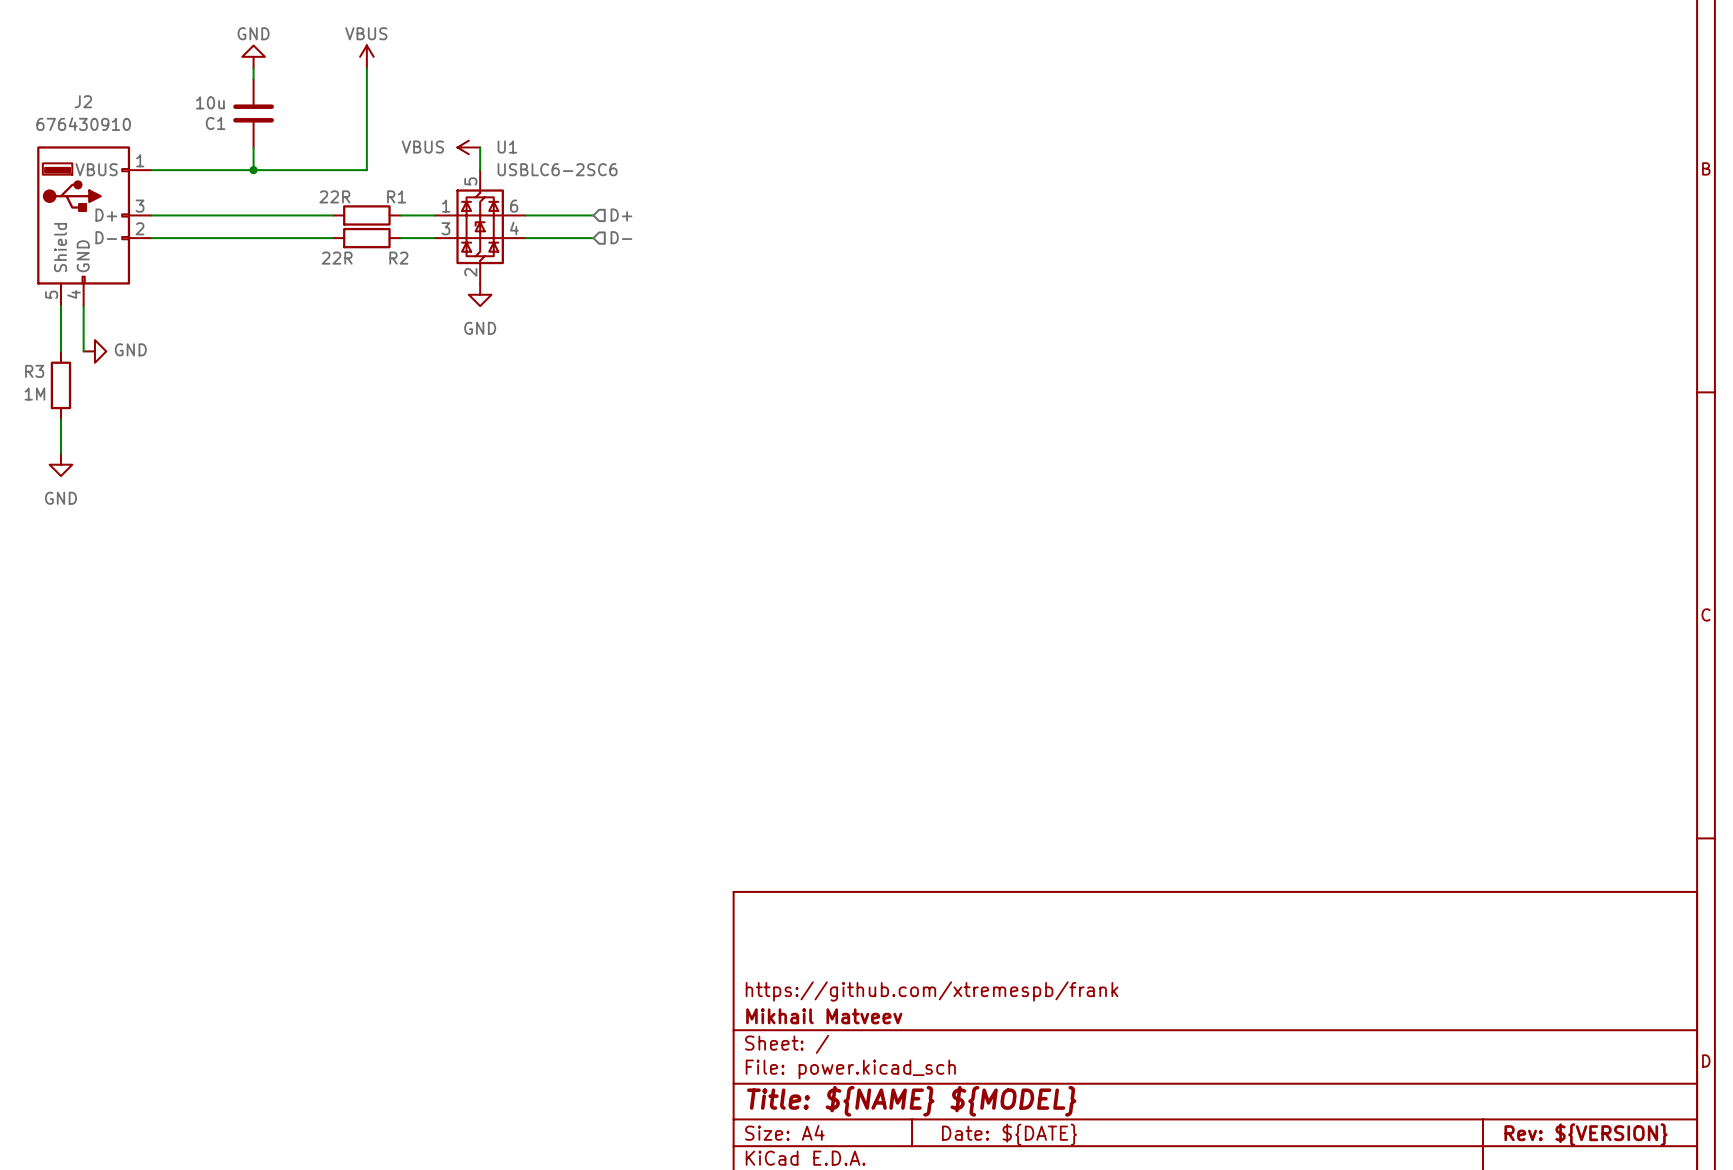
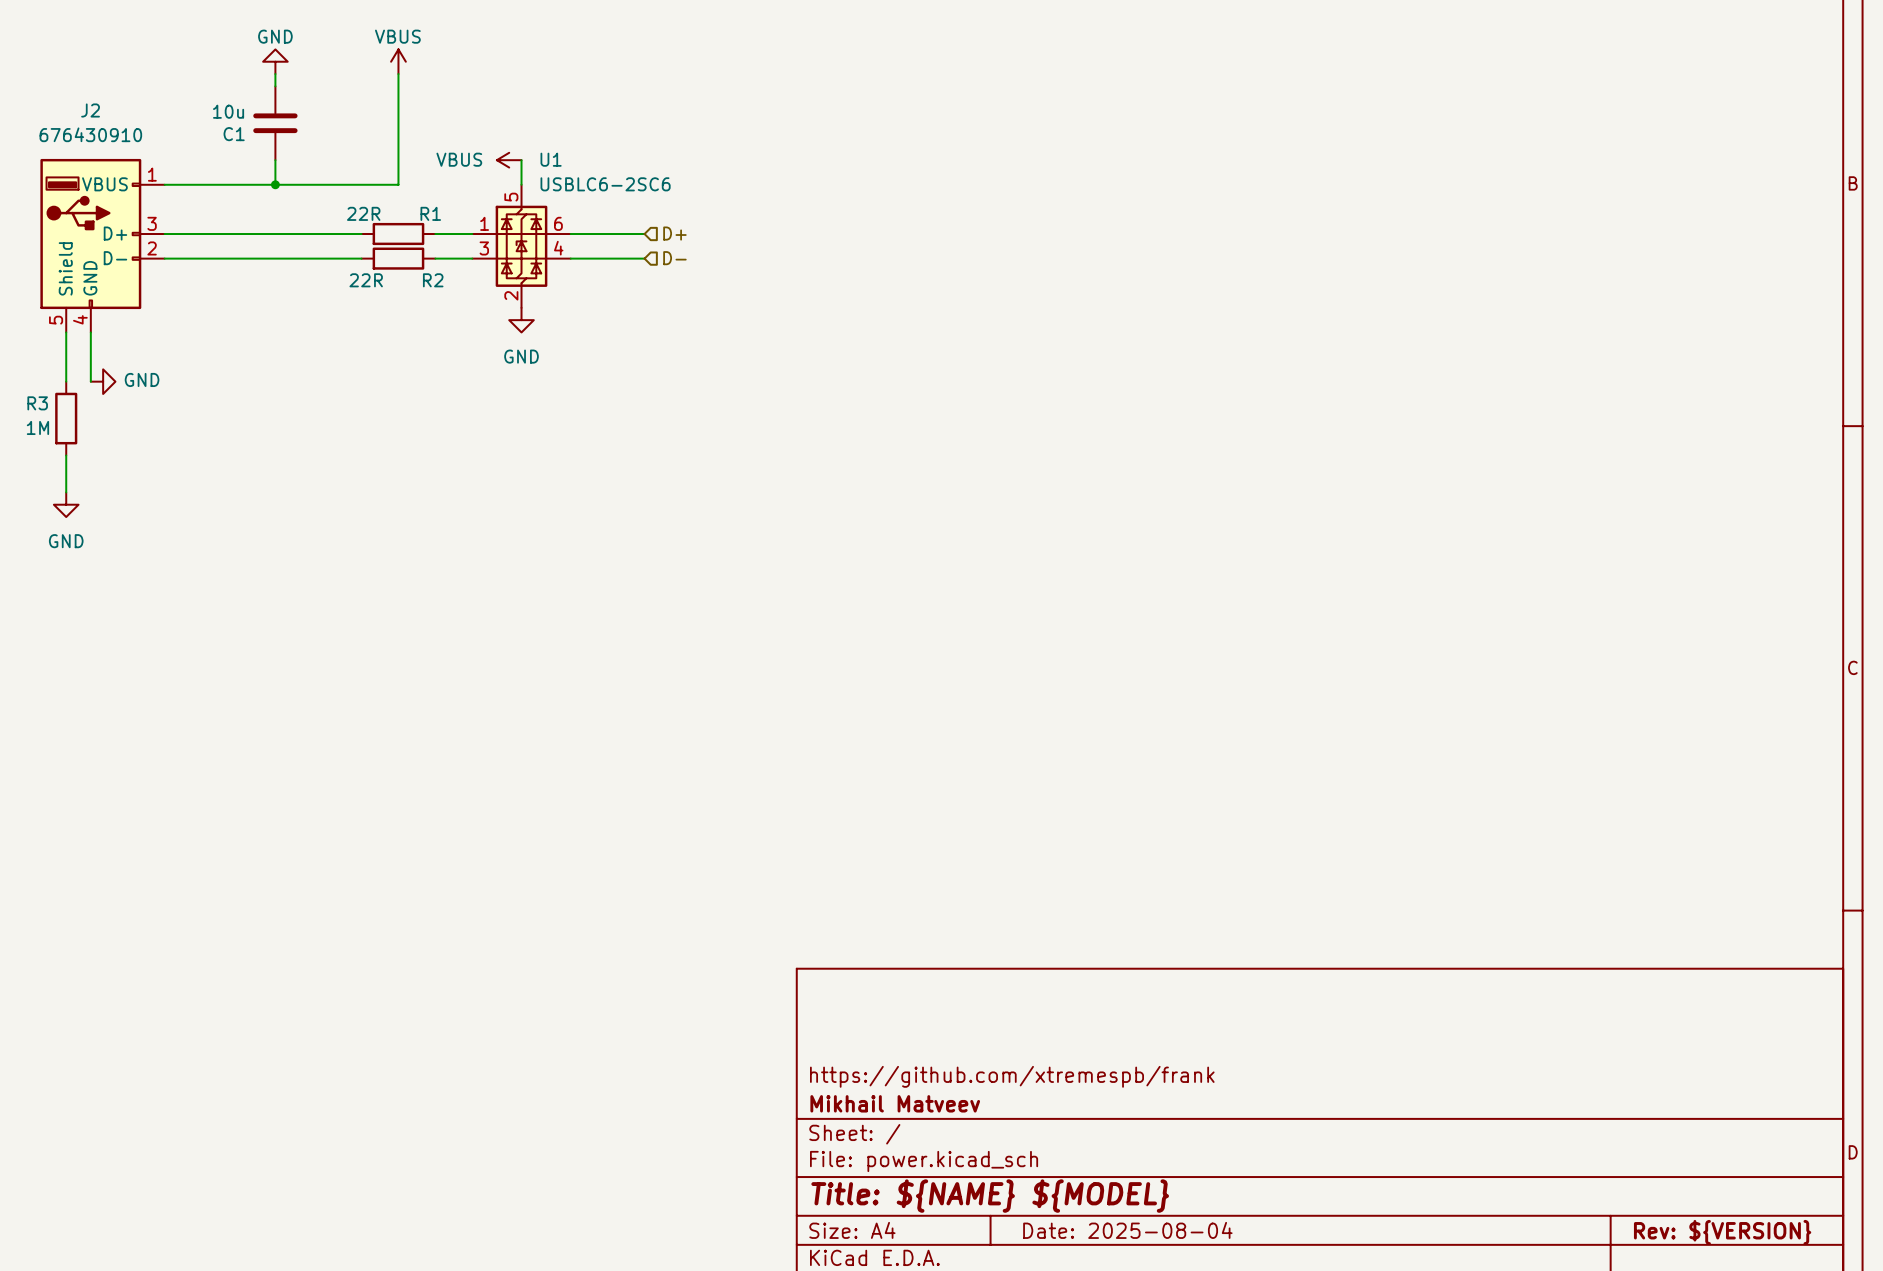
title block: Date: ${DATE} (1009, 1134) -> Date: 2025-08-04 (1127, 1230)

